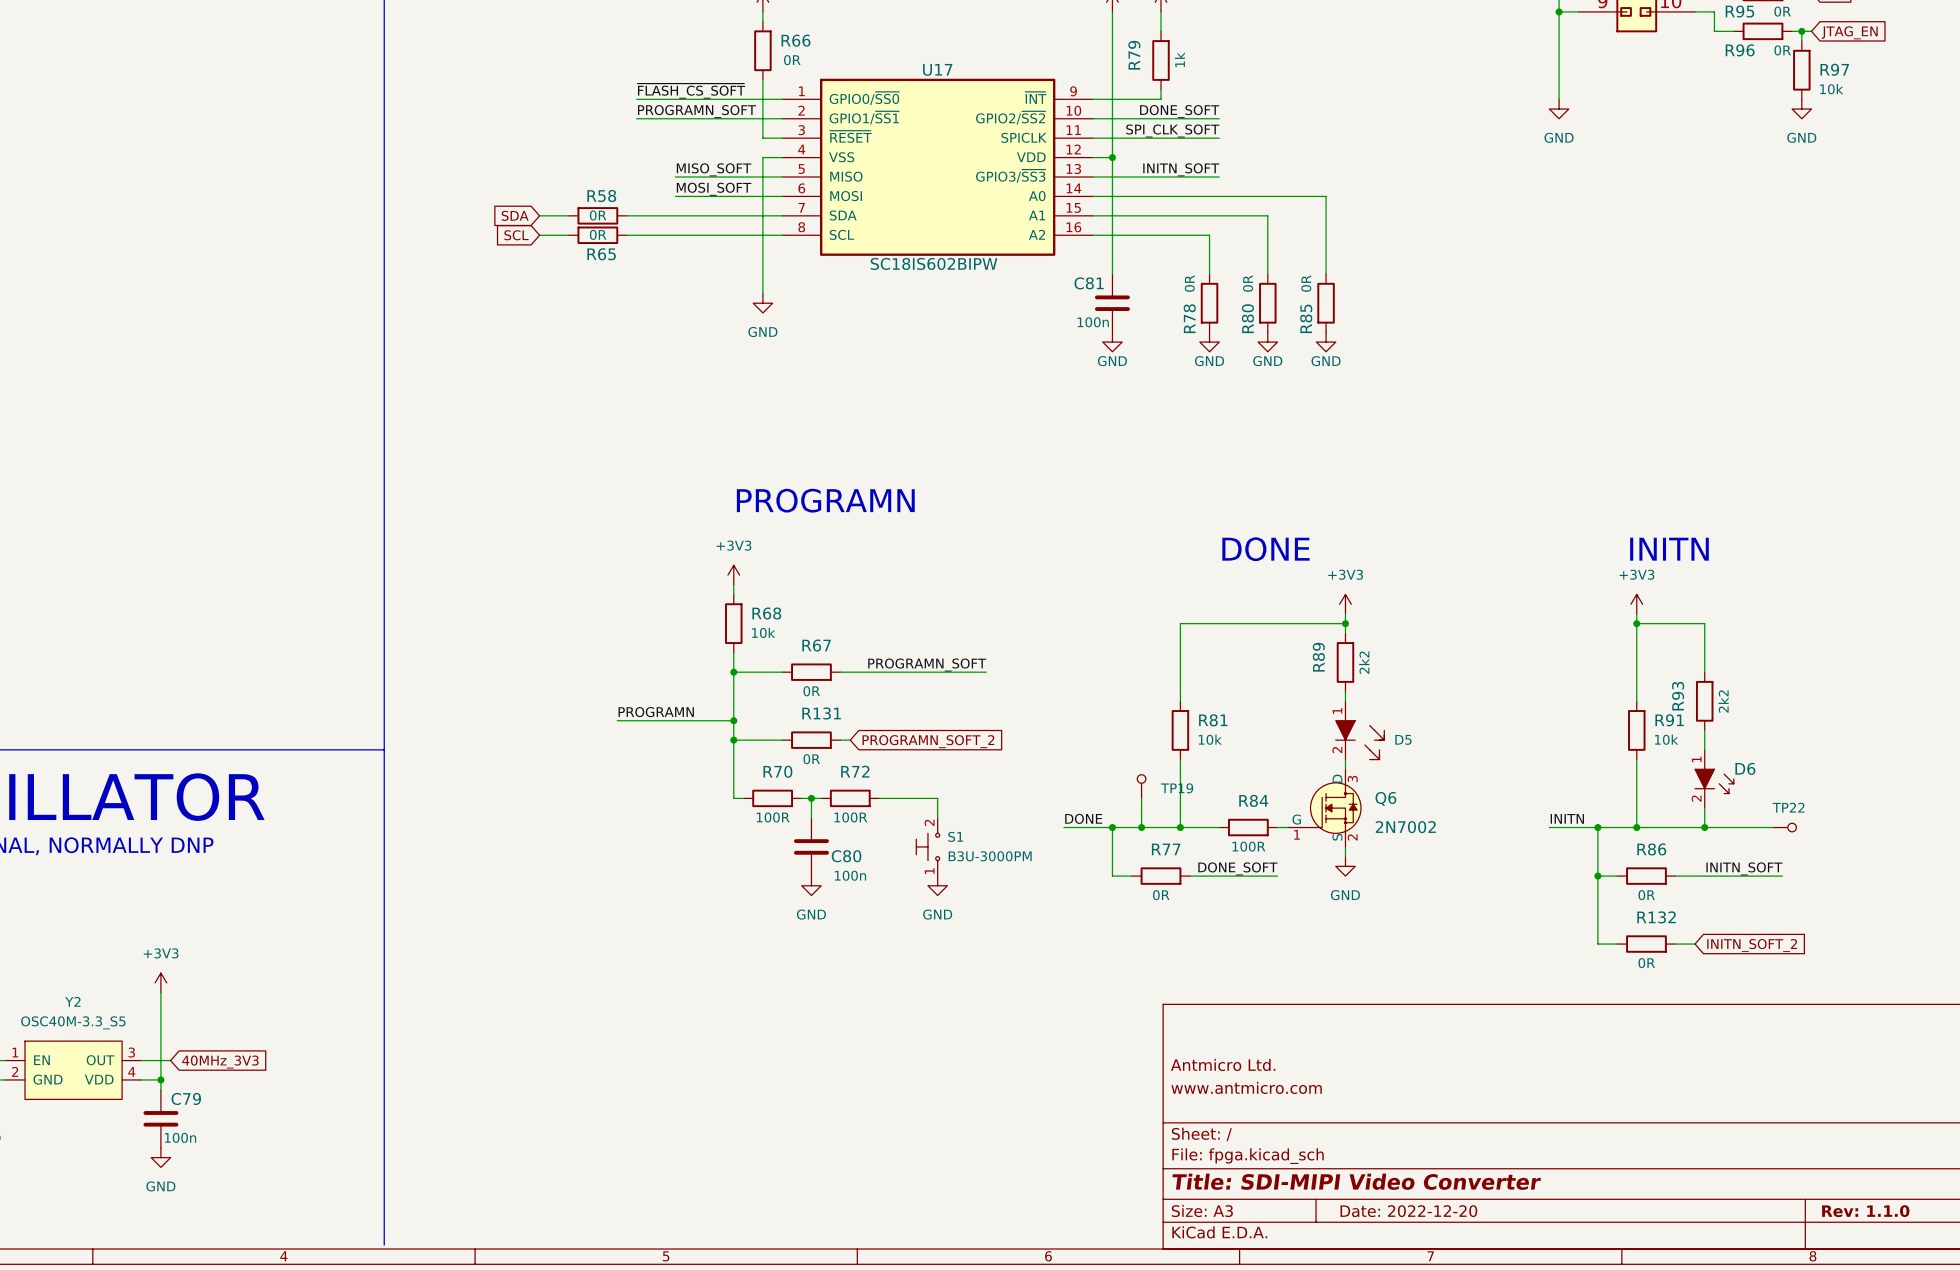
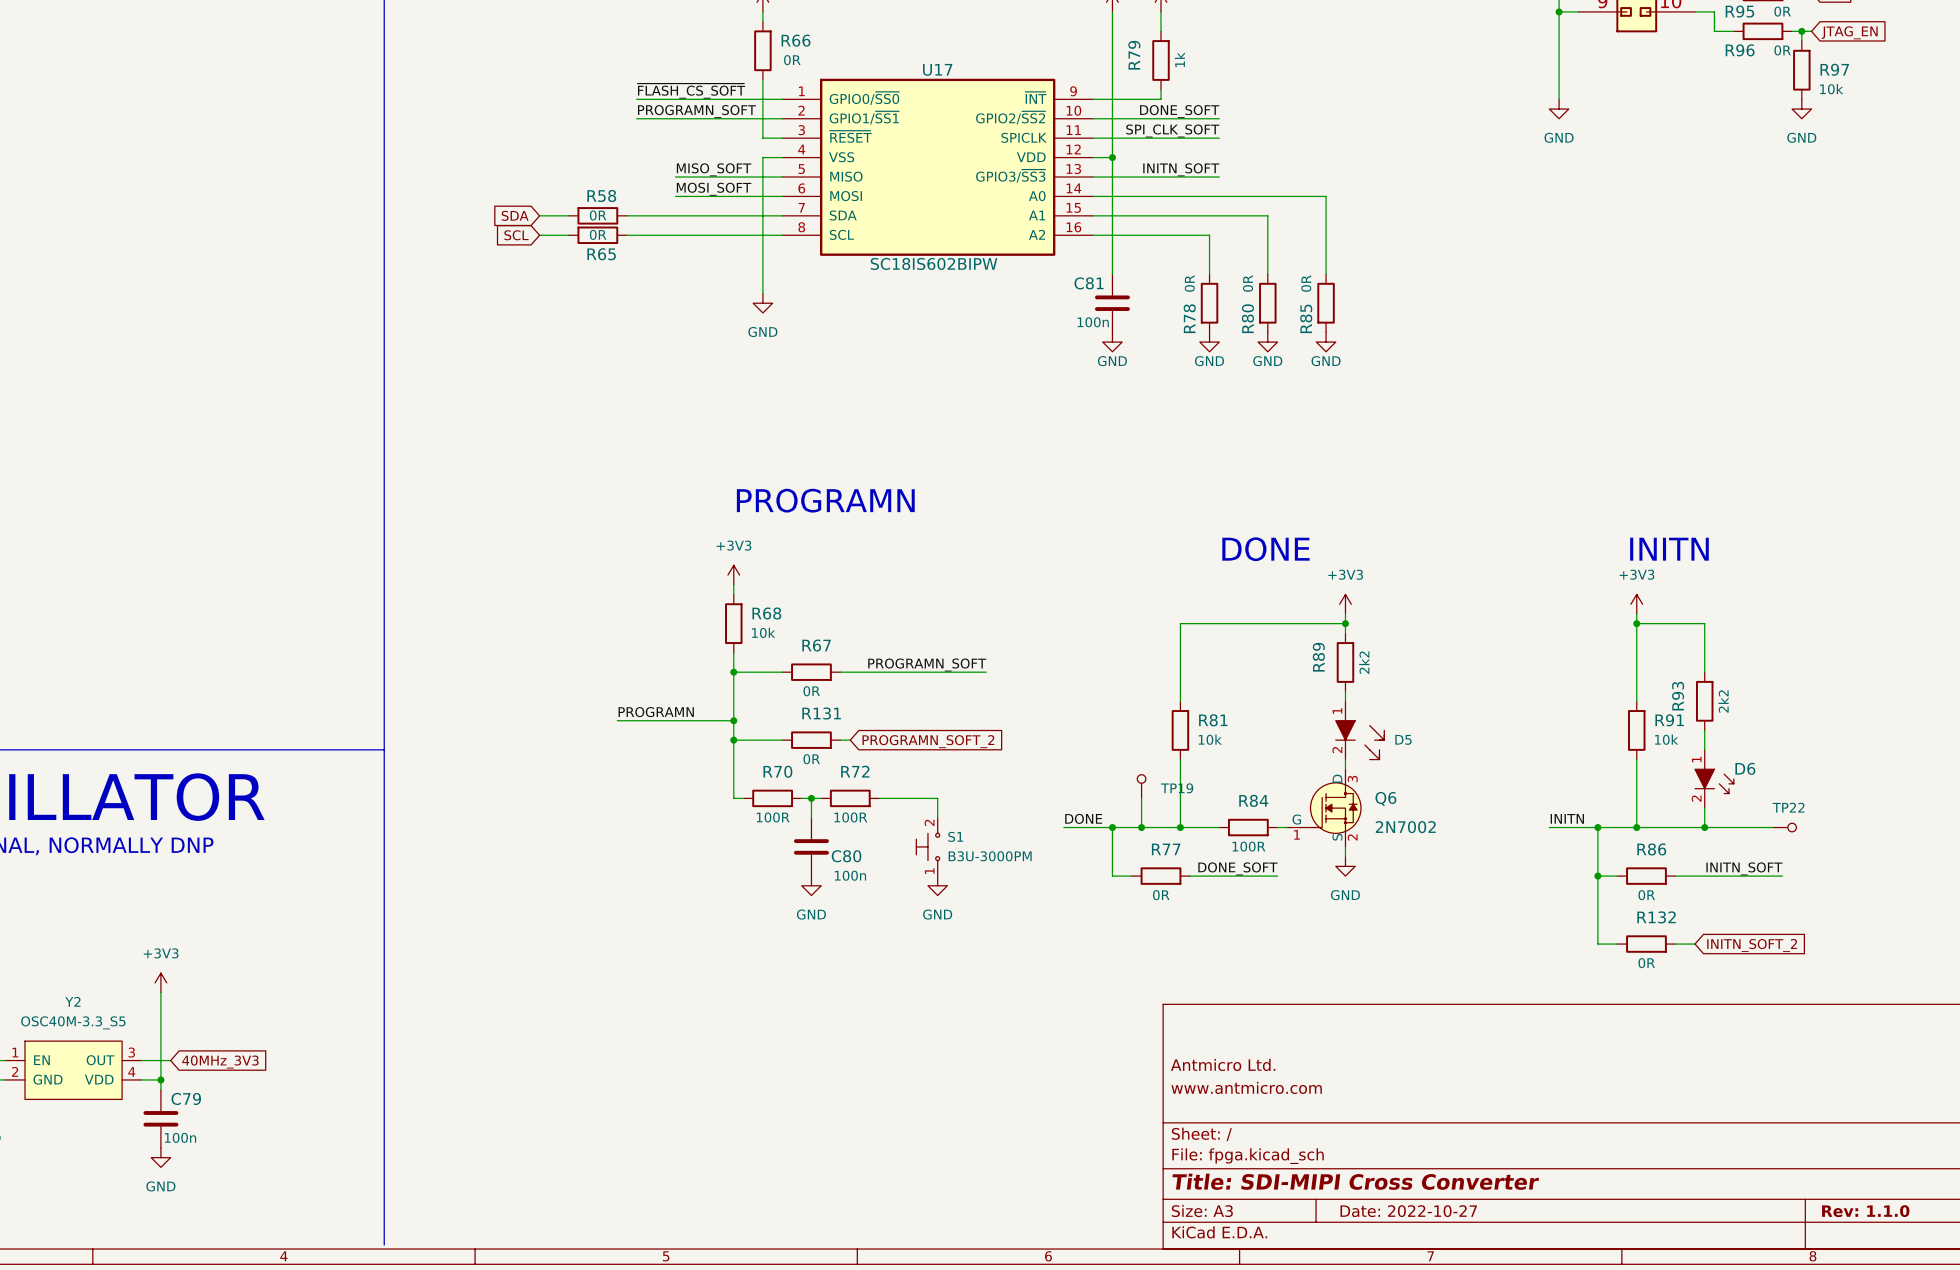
title block: Title: SDI-MIPI Video Converter (1356, 1181) -> Title: SDI-MIPI Cross Converter (1355, 1181)
title block: Date: 2022-12-20 (1408, 1211) -> Date: 2022-10-27 (1408, 1211)

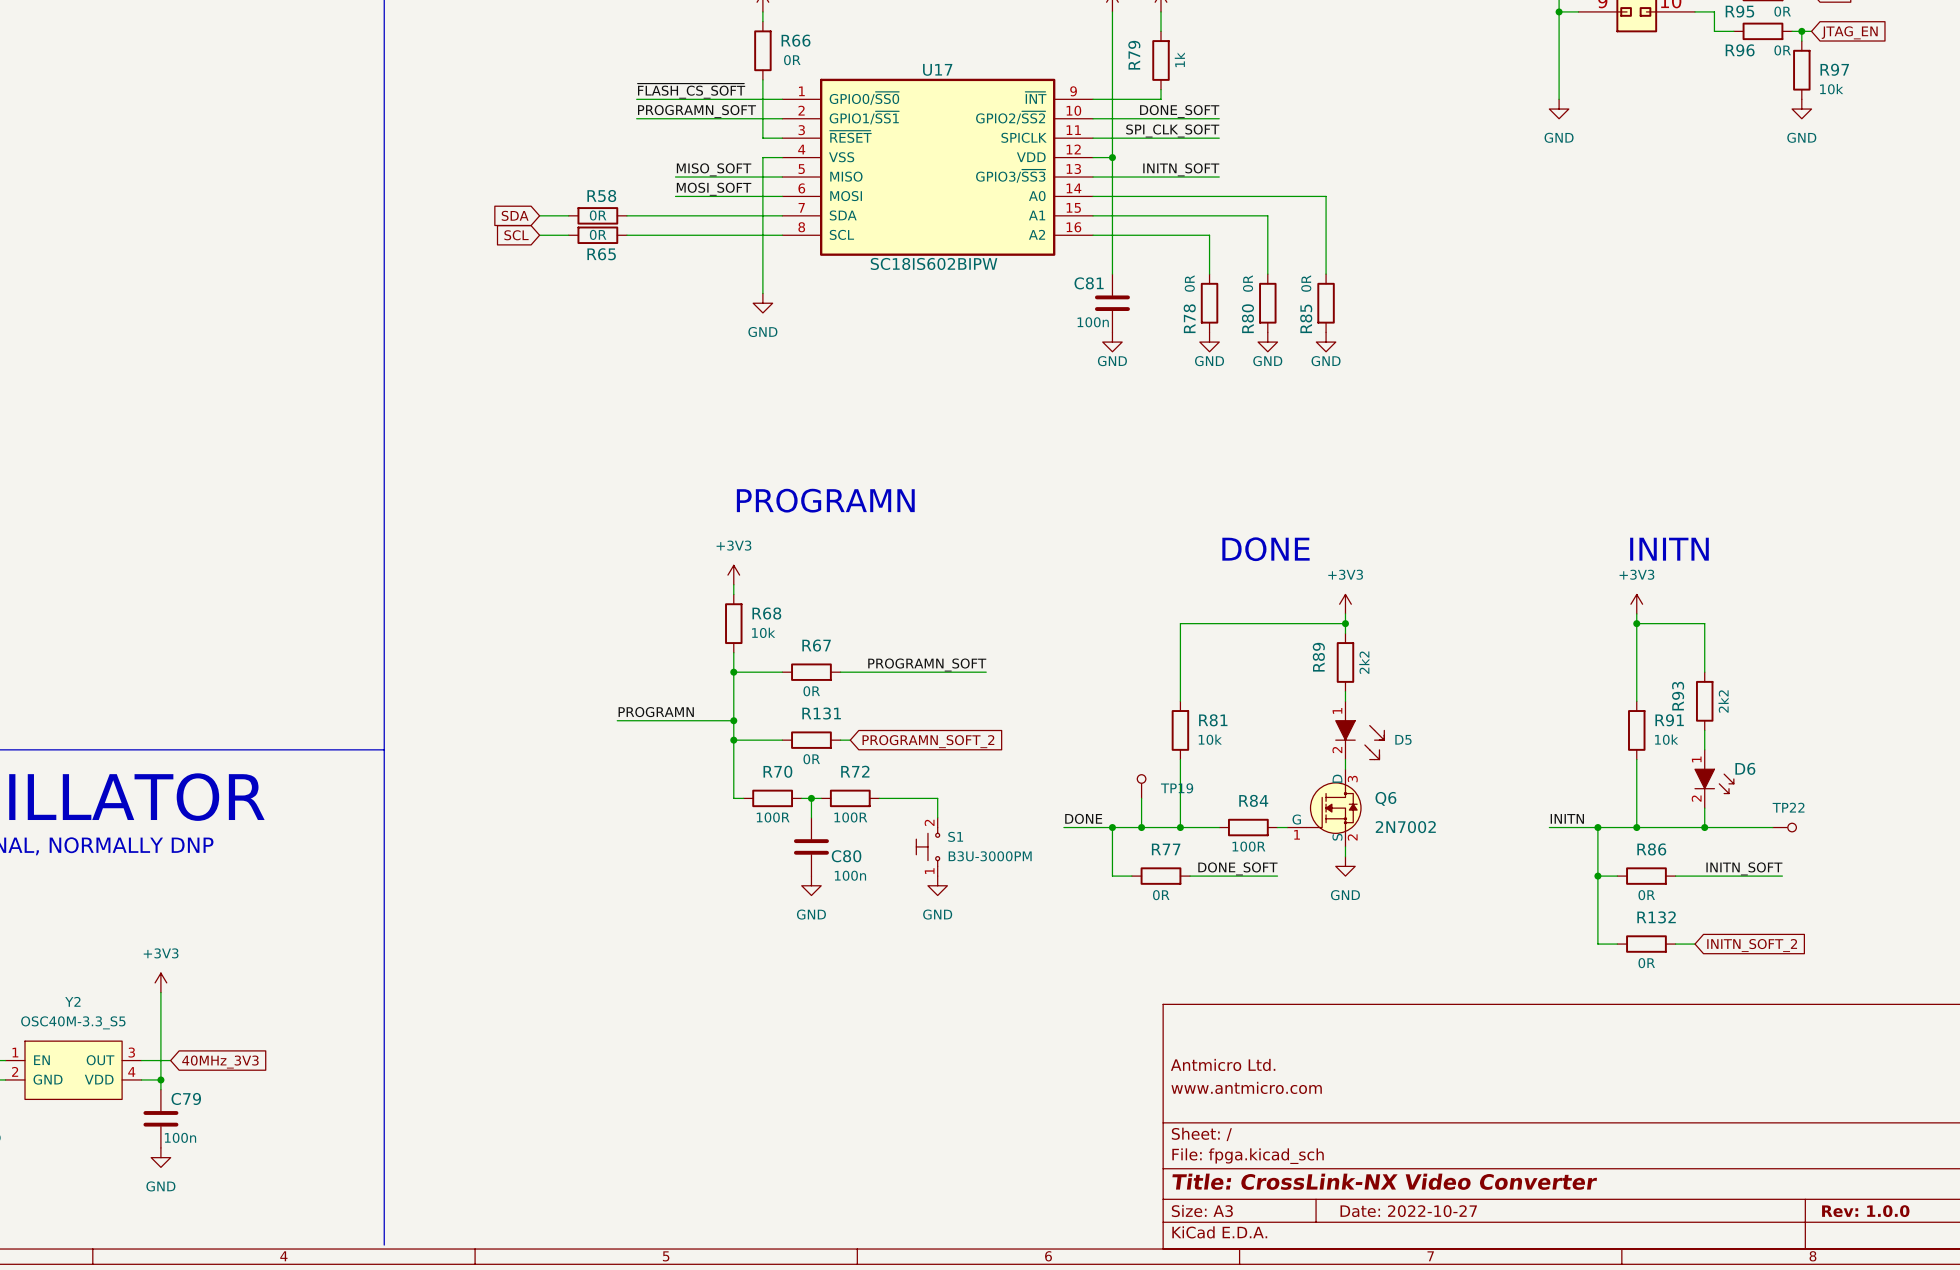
title block: Title: SDI-MIPI Cross Converter (1355, 1181) -> Title: CrossLink-NX Video Converter (1384, 1181)
title block: Rev: 1.1.0 (1865, 1211) -> Rev: 1.0.0 (1865, 1211)

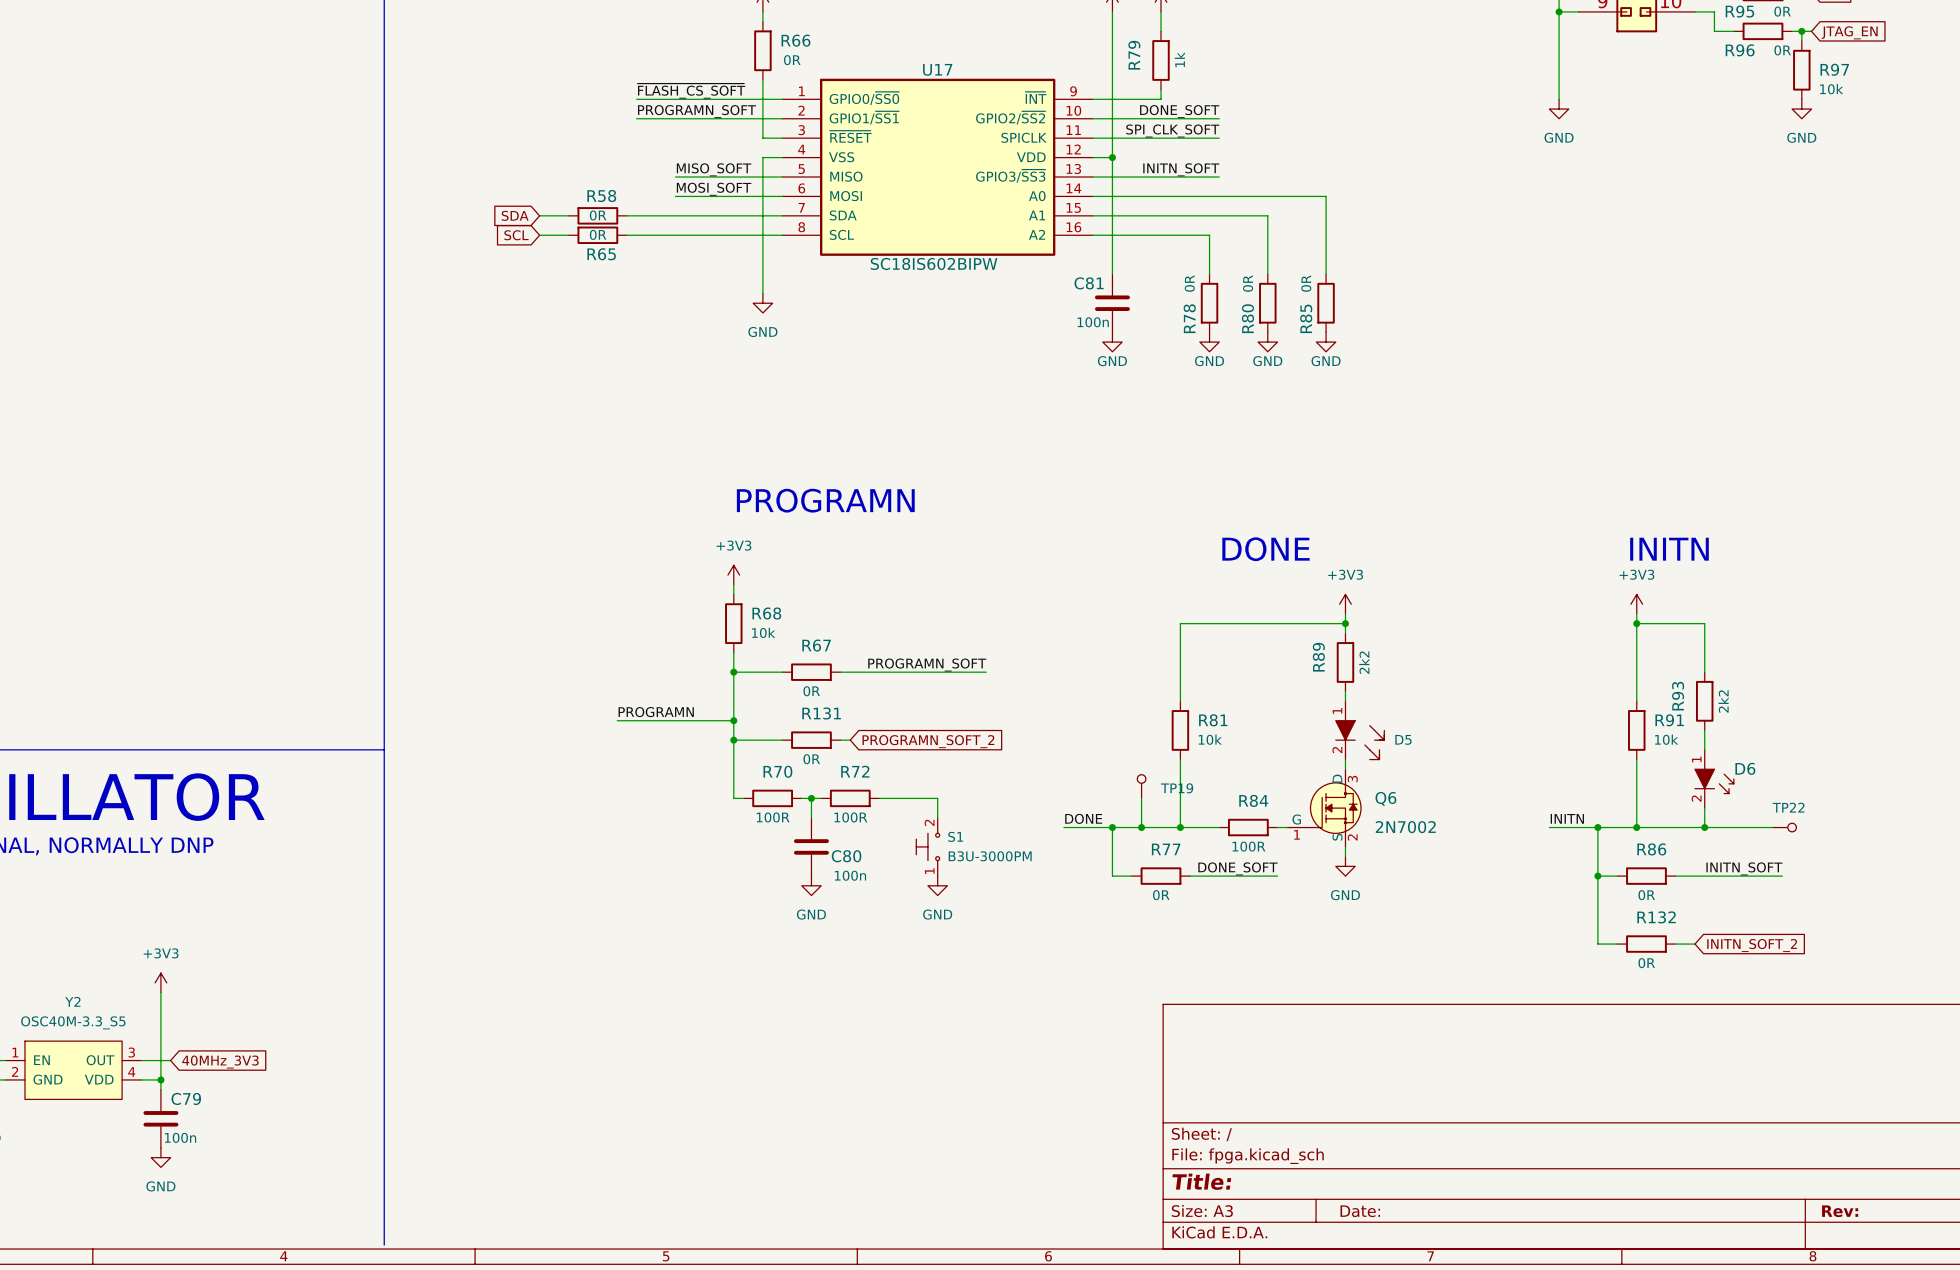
title block: Antmicro Ltd. (1223, 1064) -> none
title block: www.antmicro.com (1246, 1087) -> none
title block: Title: CrossLink-NX Video Converter (1384, 1181) -> Title: (1201, 1181)
title block: Date: 2022-10-27 (1408, 1211) -> Date: (1360, 1211)
title block: Rev: 1.0.0 (1865, 1211) -> Rev: (1840, 1211)

